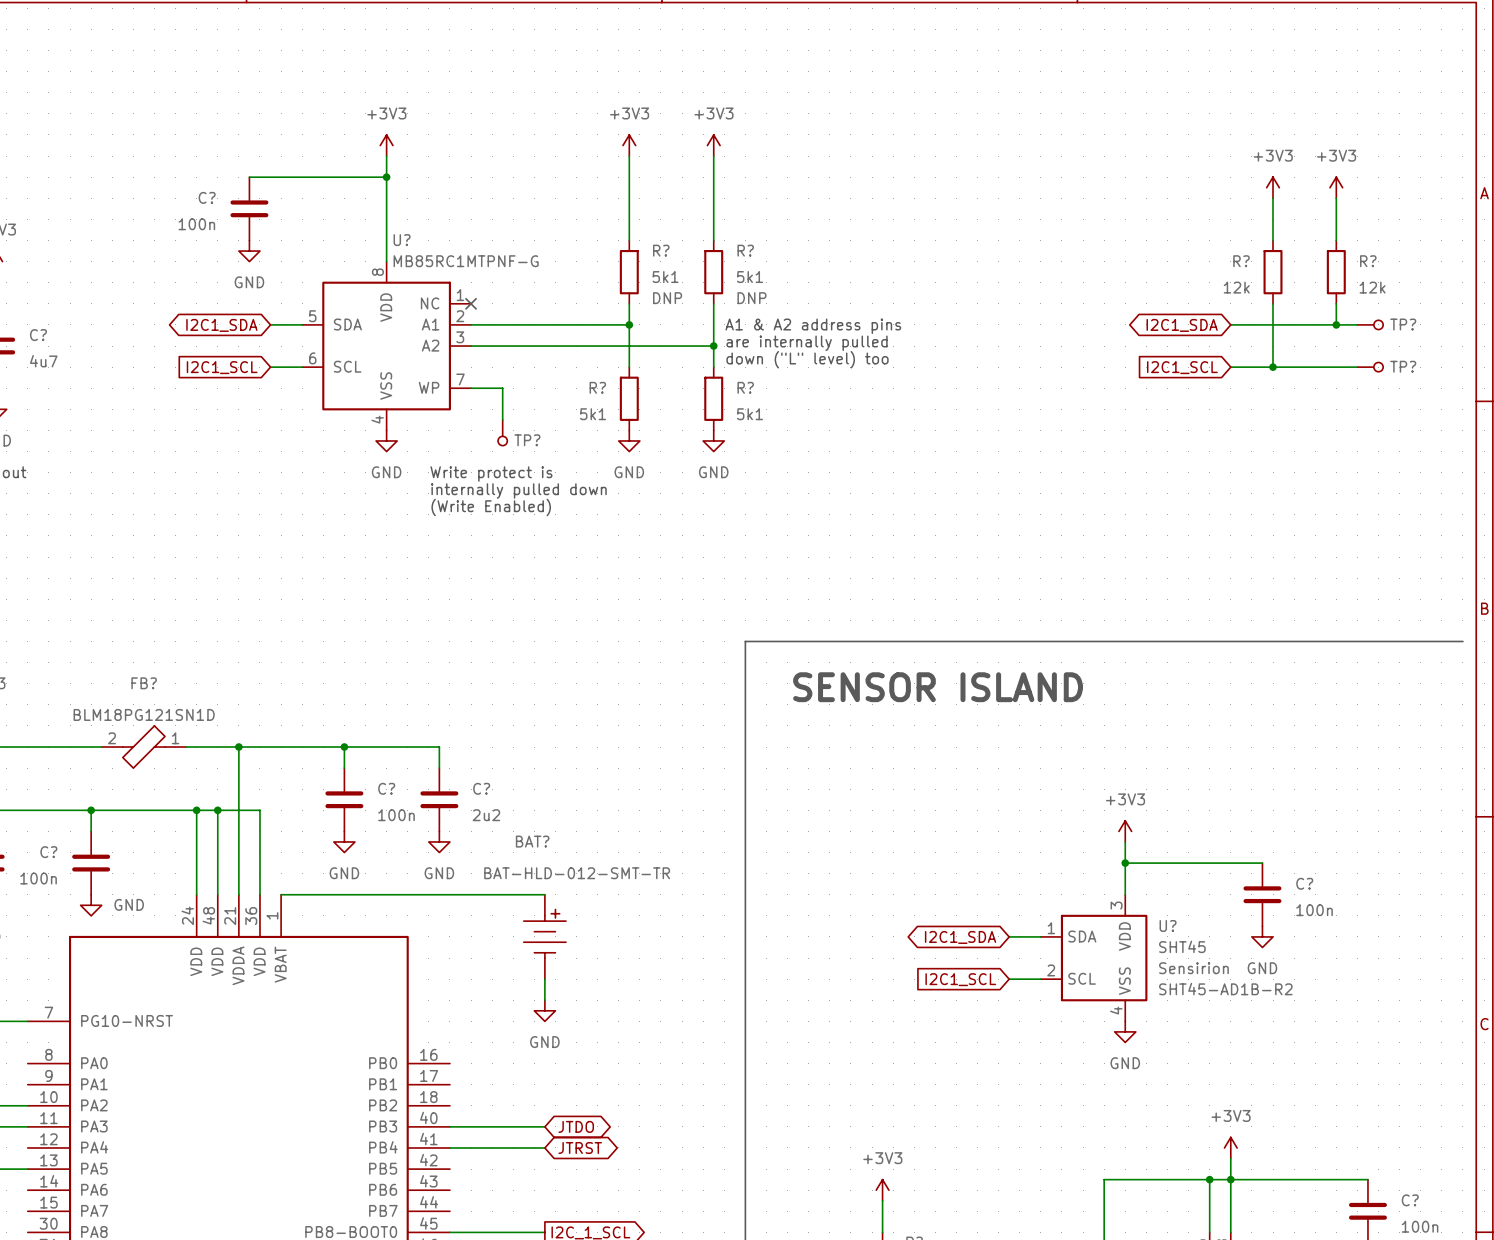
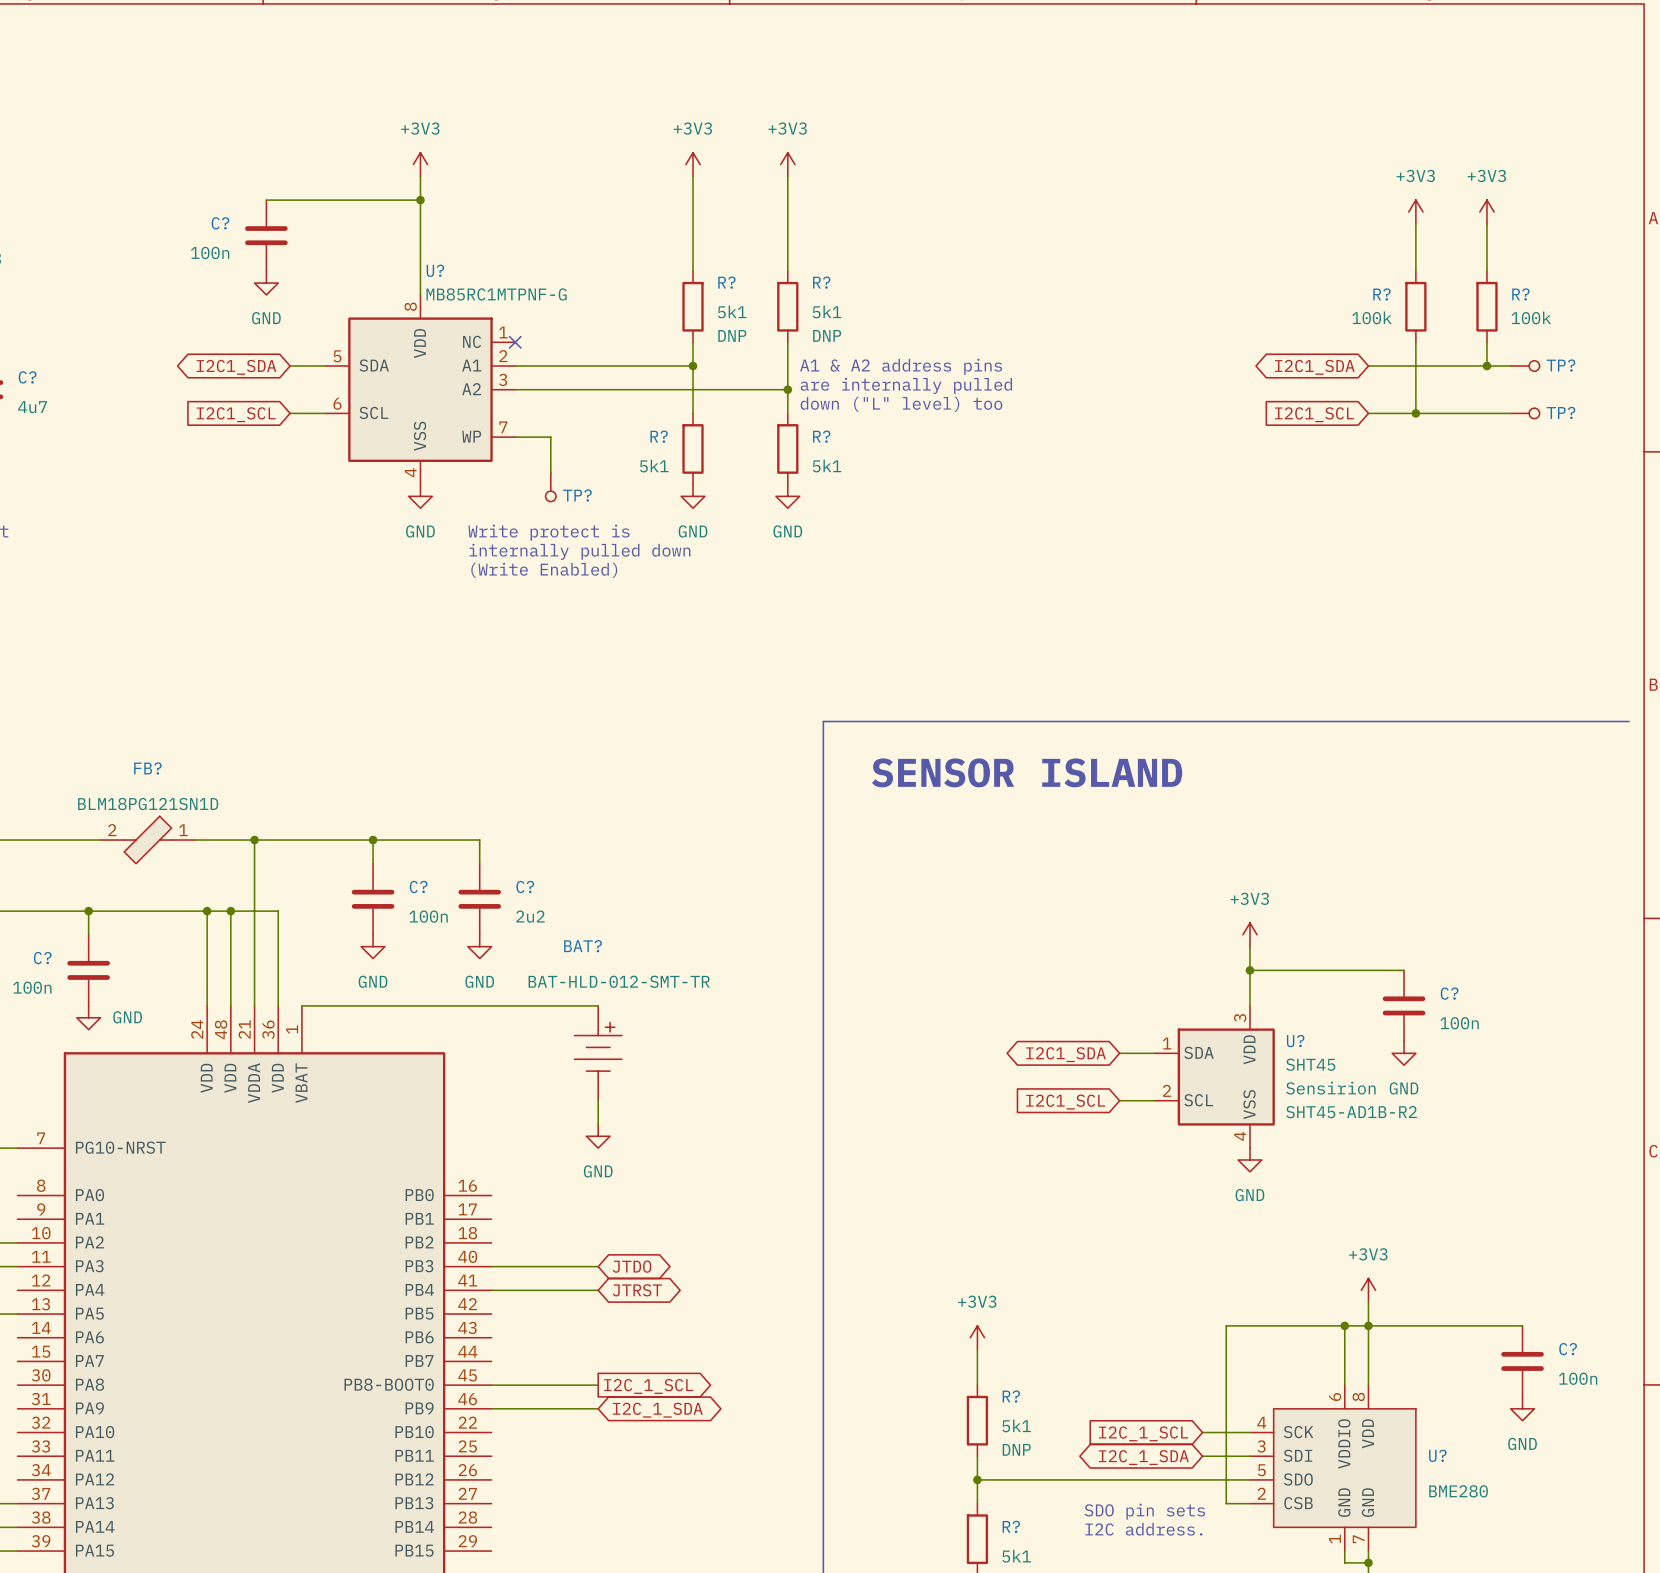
R? text: 12k (1236, 287) -> 100k (1372, 317)
R? text: 12k (1372, 287) -> 100k (1531, 317)

